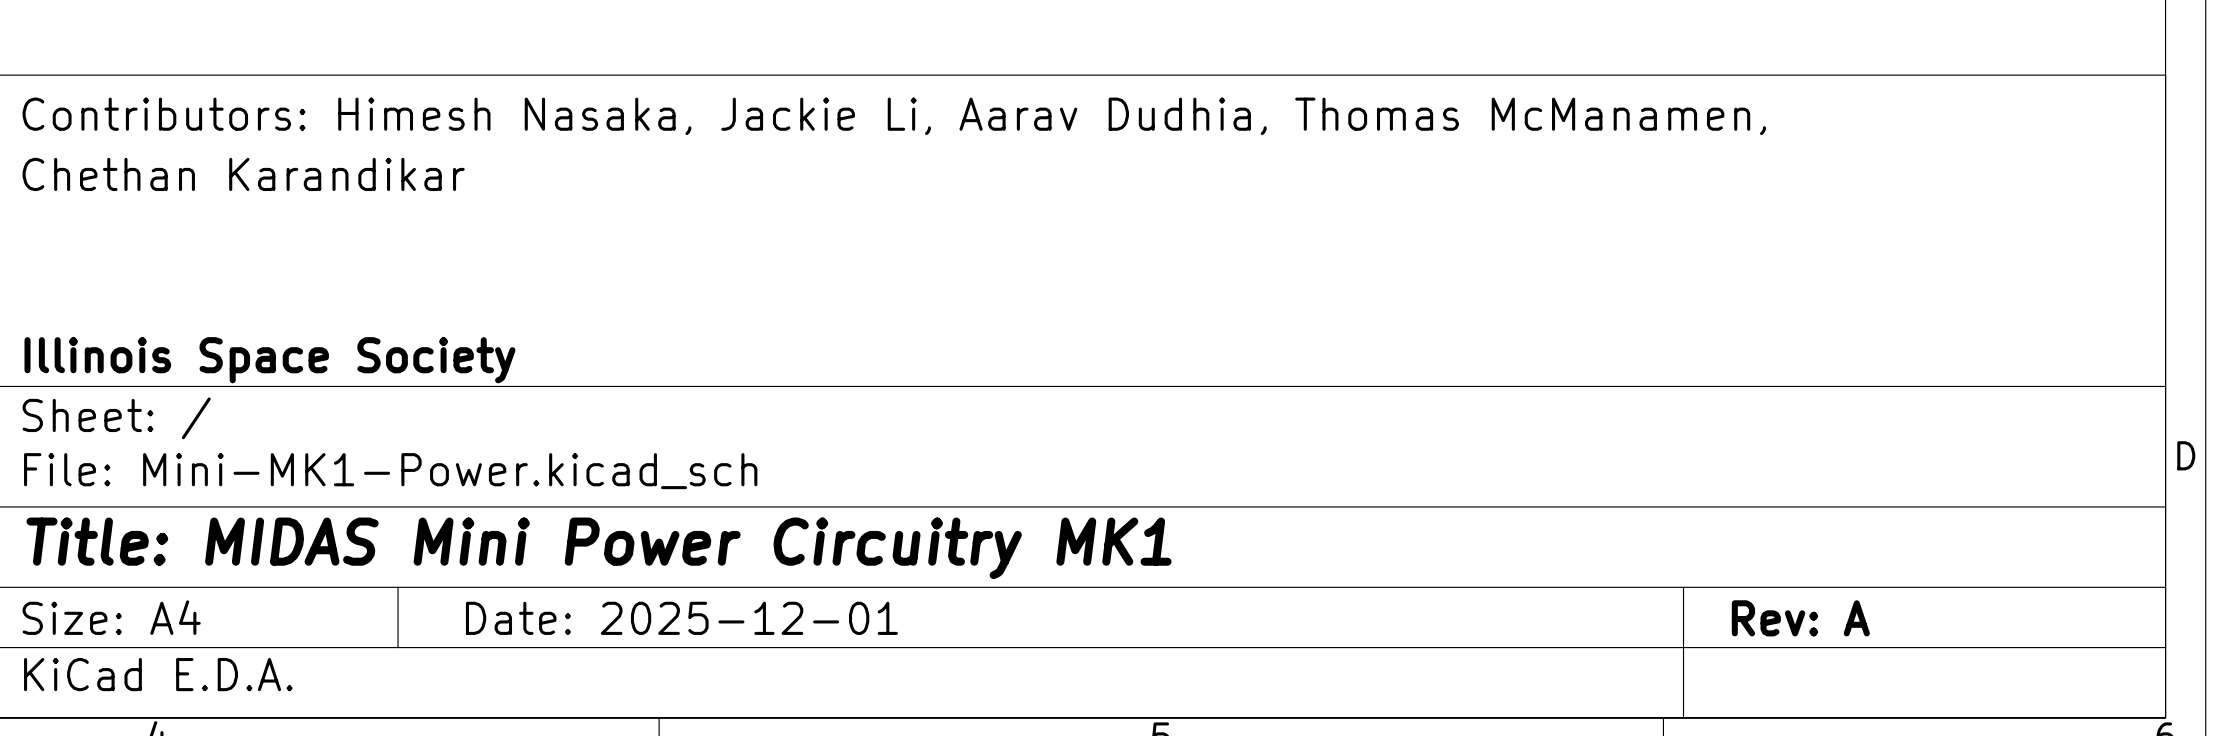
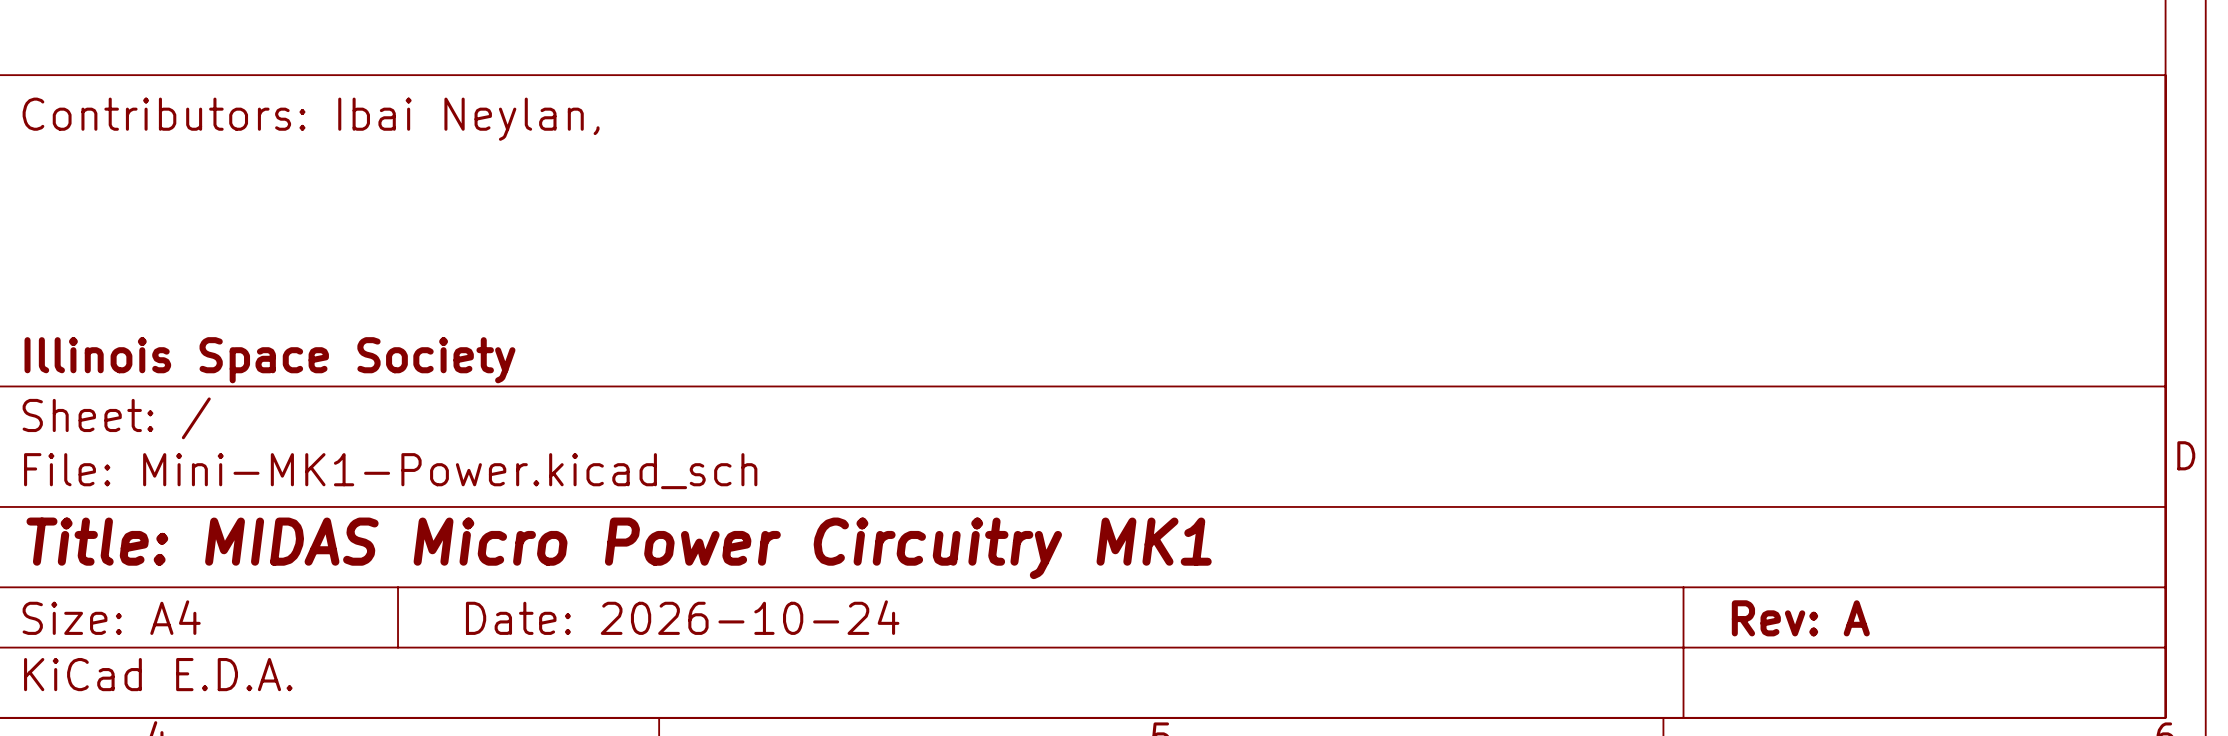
title block: Contributors: Himesh Nasaka, Jackie Li, Aarav Dudhia, Thomas McManamen, (894, 116) -> Contributors: Ibai Neylan, (311, 119)
title block: Chethan Karandikar (243, 174) -> none
title block: Title: MIDAS Mini Power Circuitry MK1 (599, 548) -> Title: MIDAS Micro Power Circuitry MK1 (619, 548)
title block: Date: 2025-12-01 (681, 618) -> Date: 2026-10-24 (682, 617)

